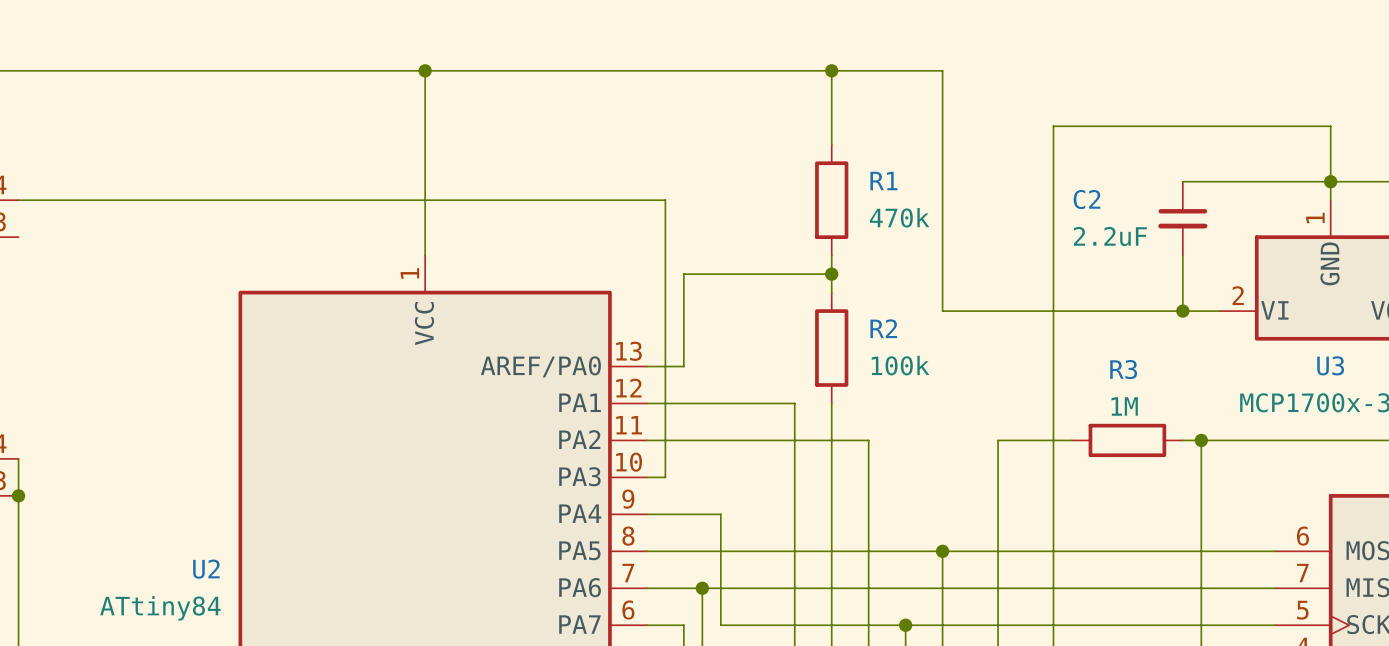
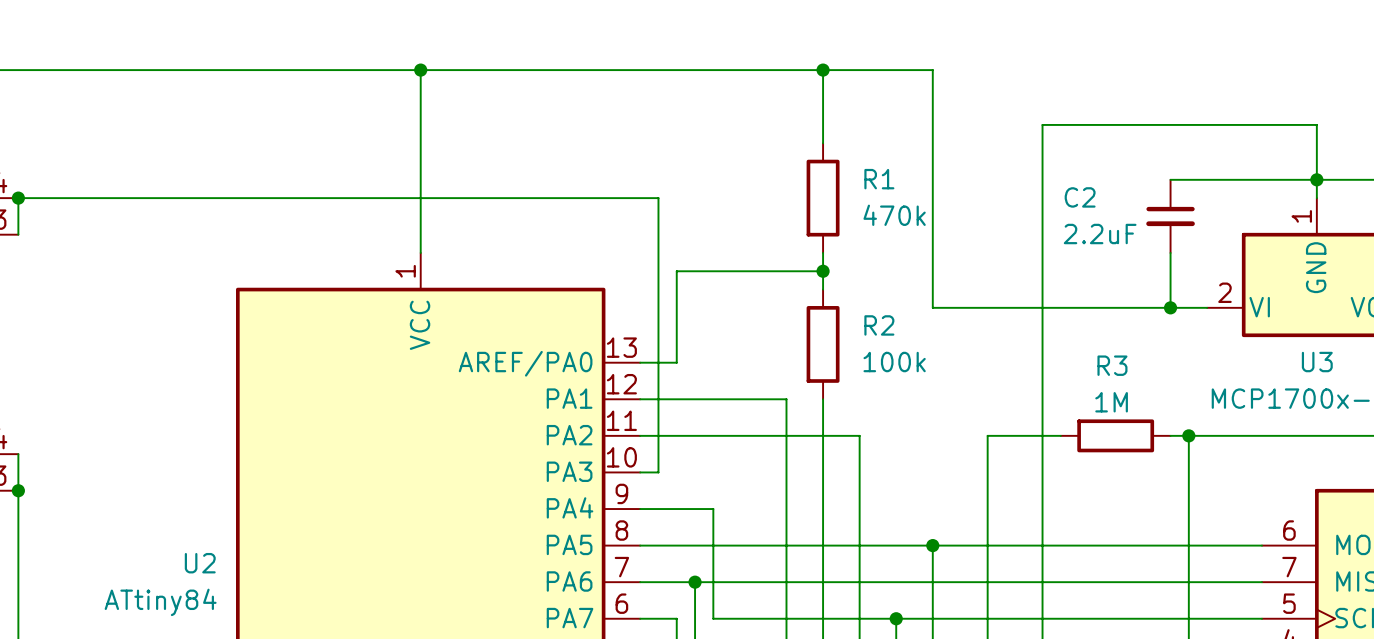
wire: none -> (18, 198) (18, 234)
junction: none -> (18, 198)

